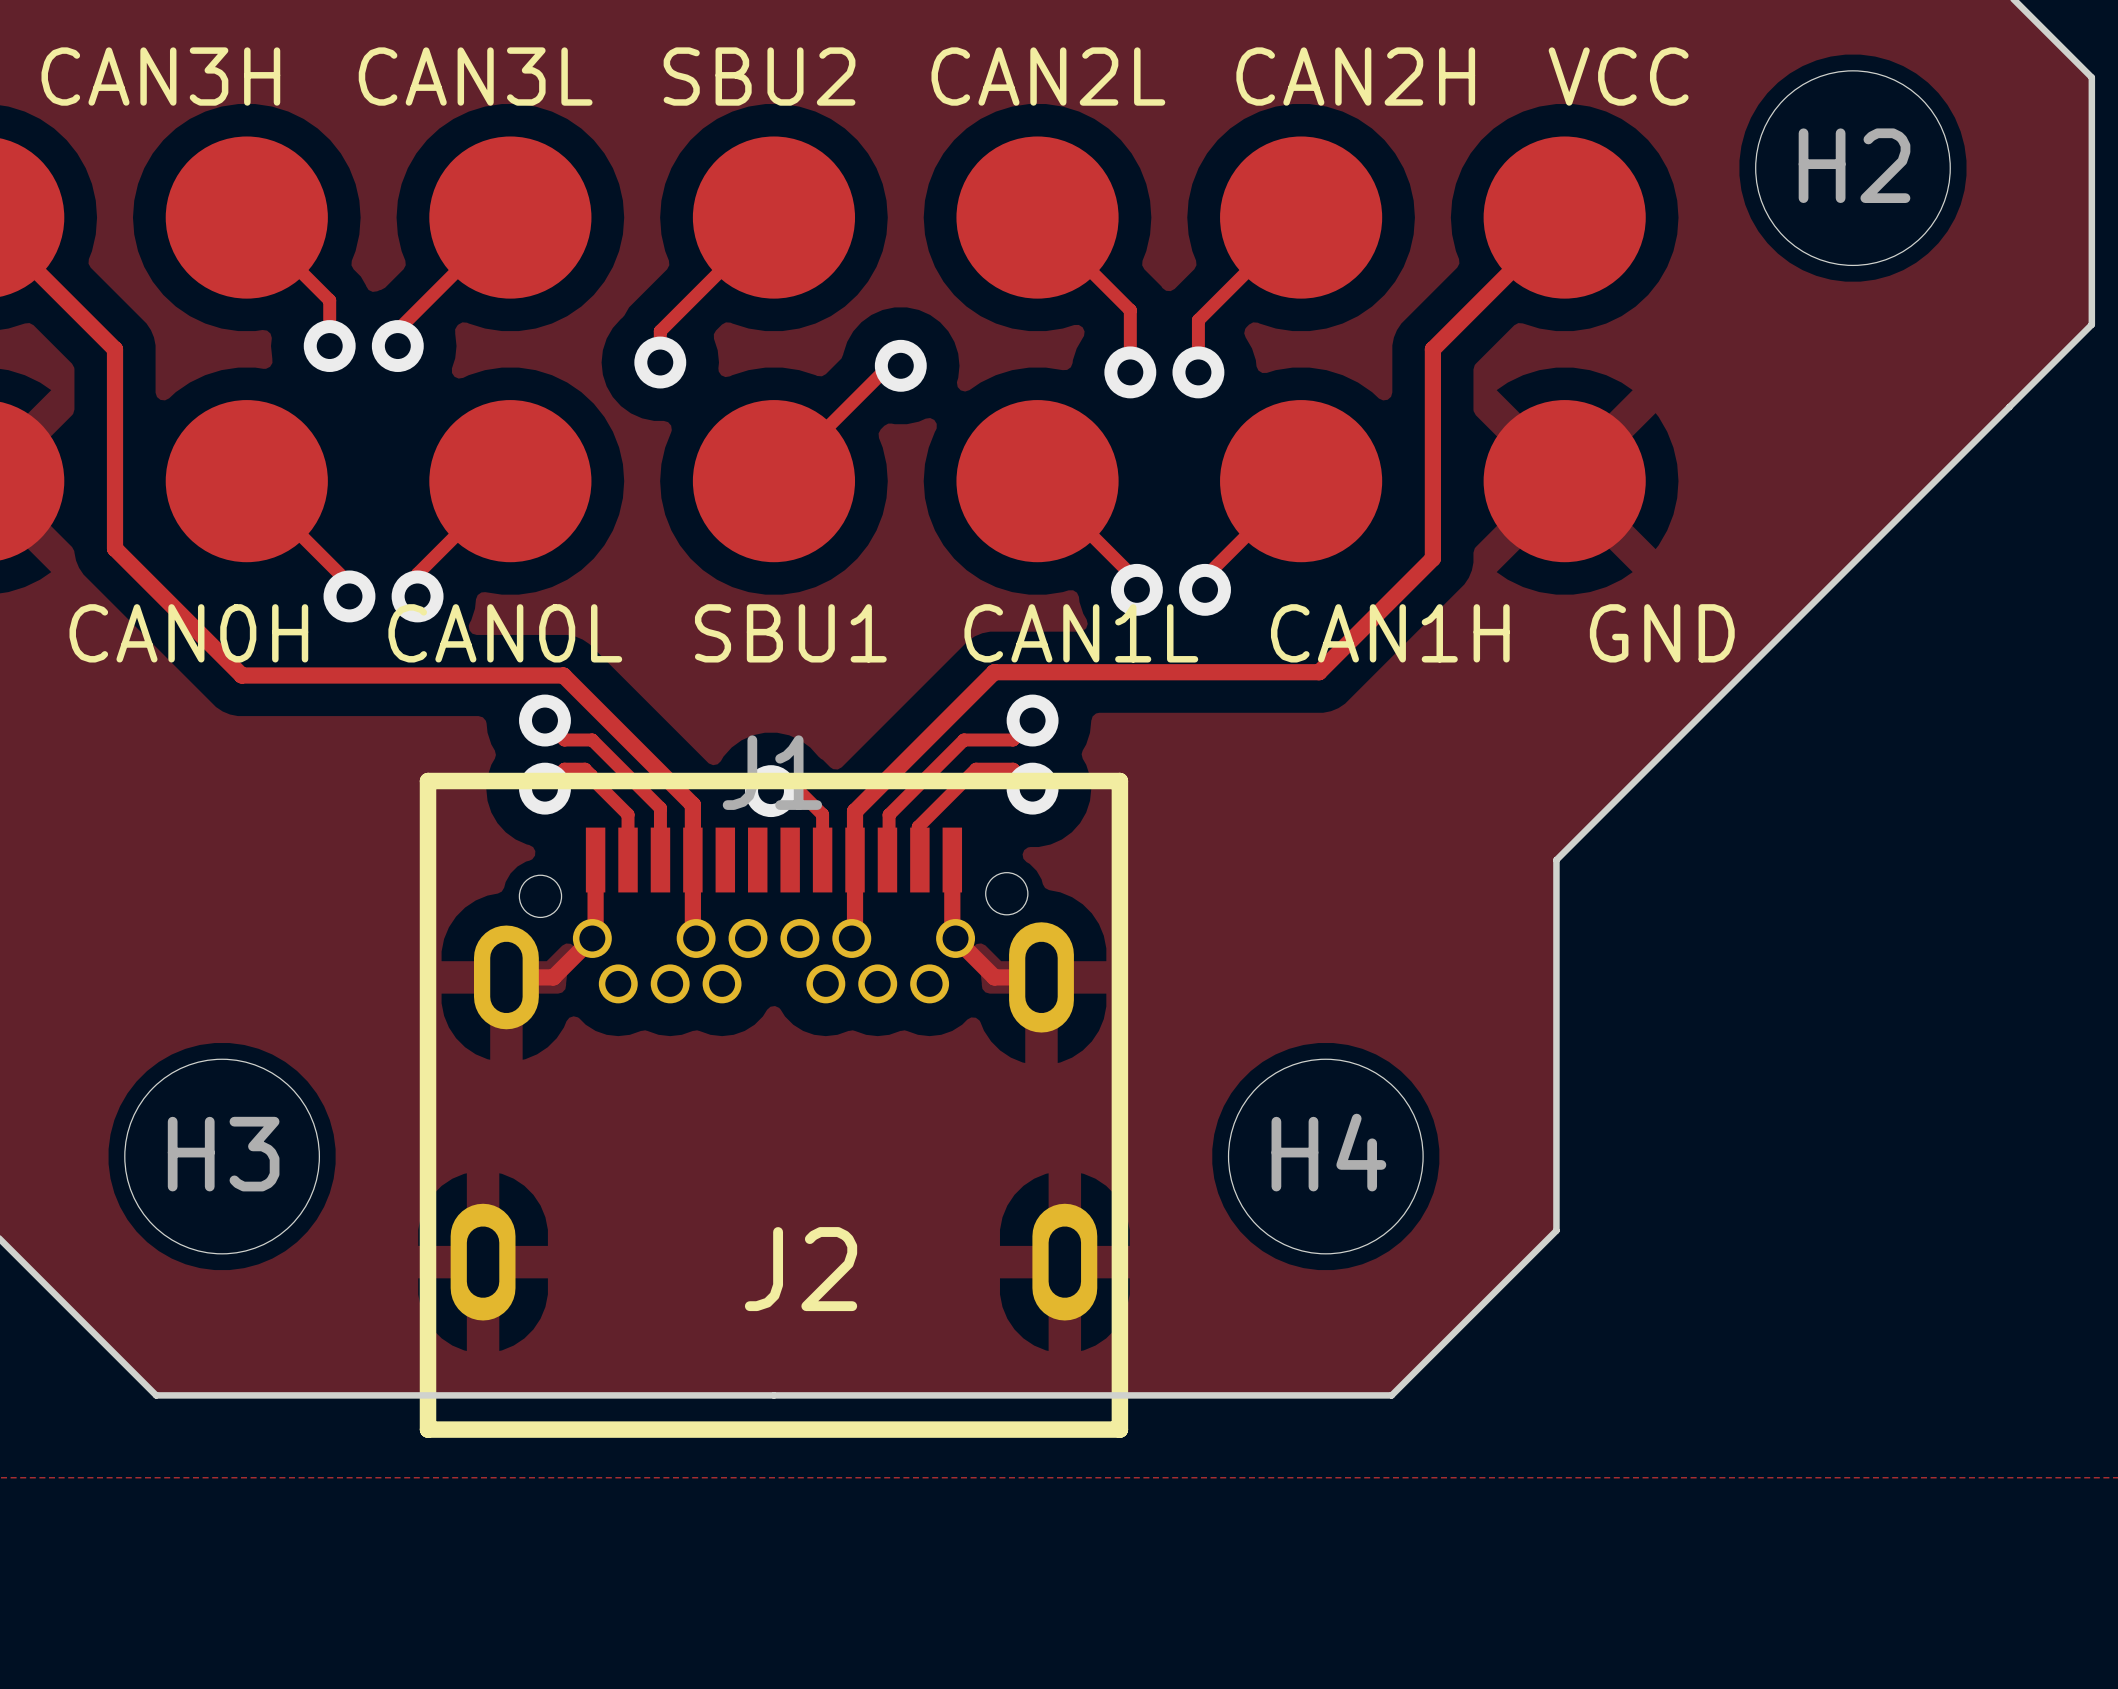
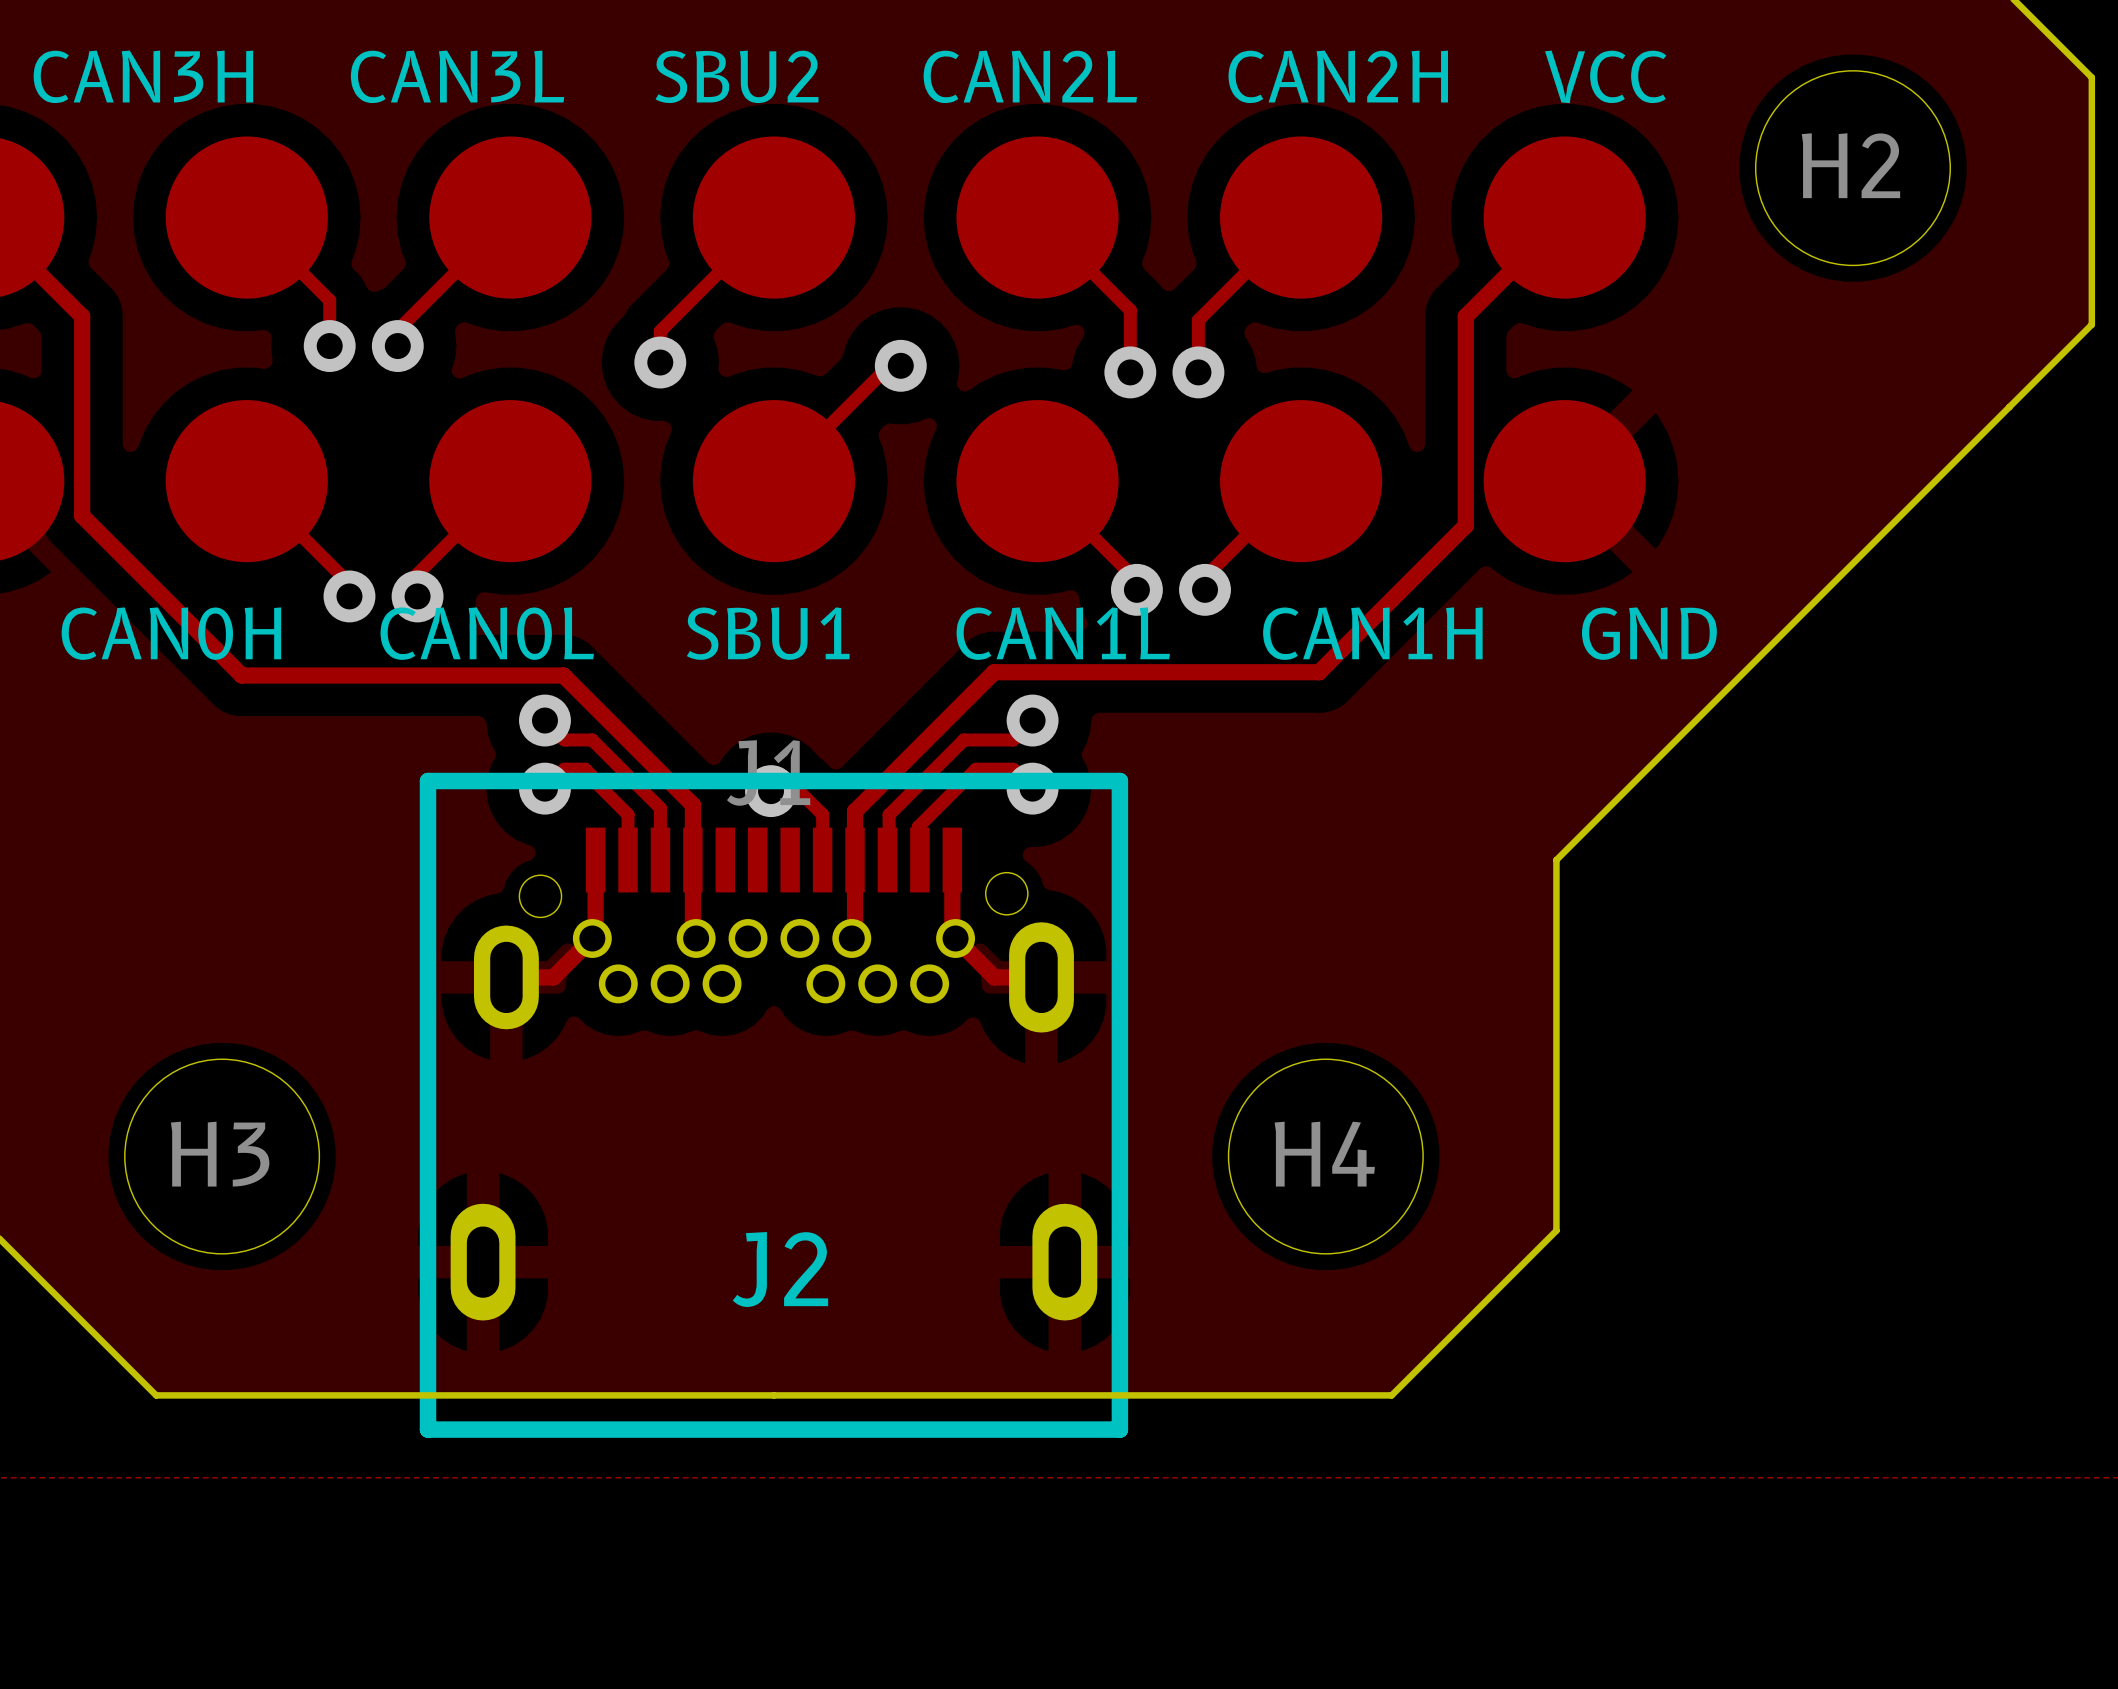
track: (82, 316) (115, 349) (115, 548) -> (82, 316) (82, 515) (115, 548)
track: (1465, 316) (1432, 349) (1432, 558) -> (1465, 316) (1465, 525) (1432, 558)

